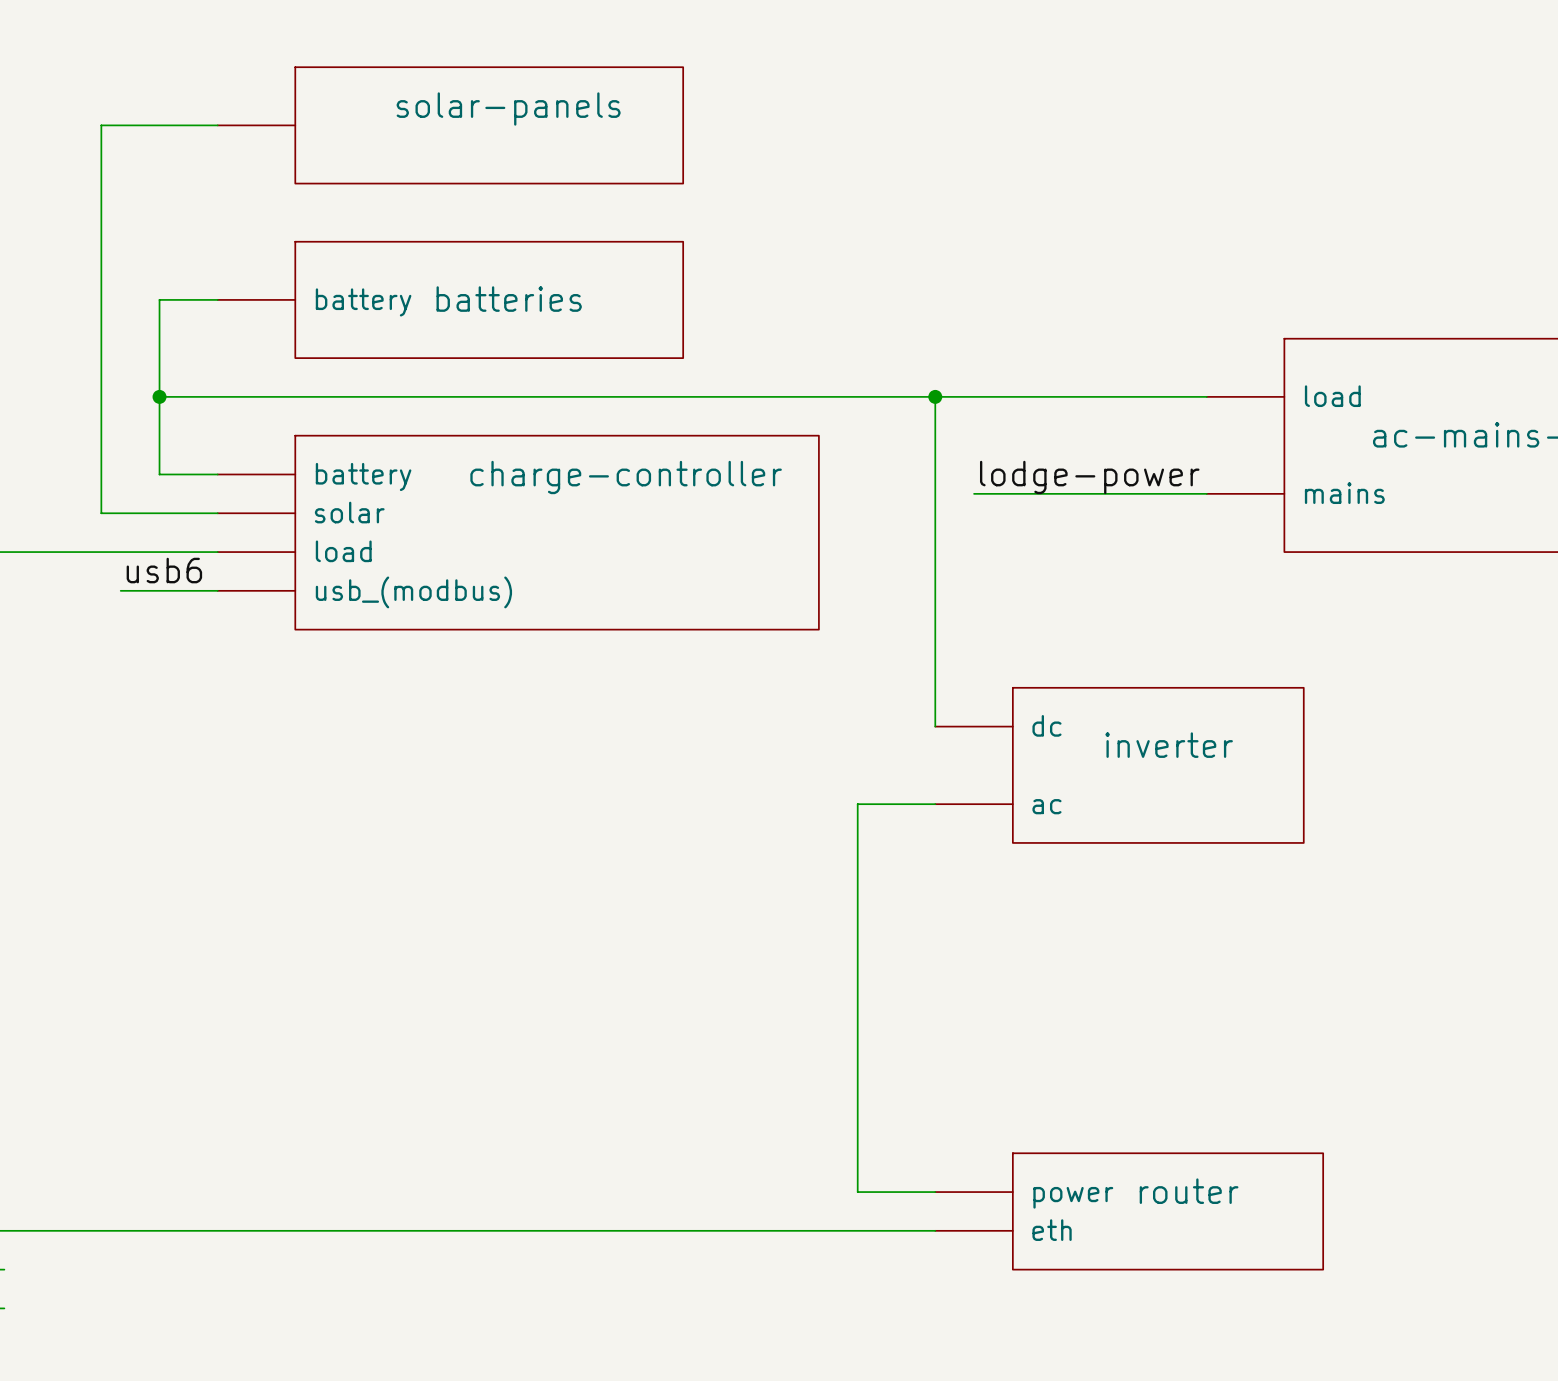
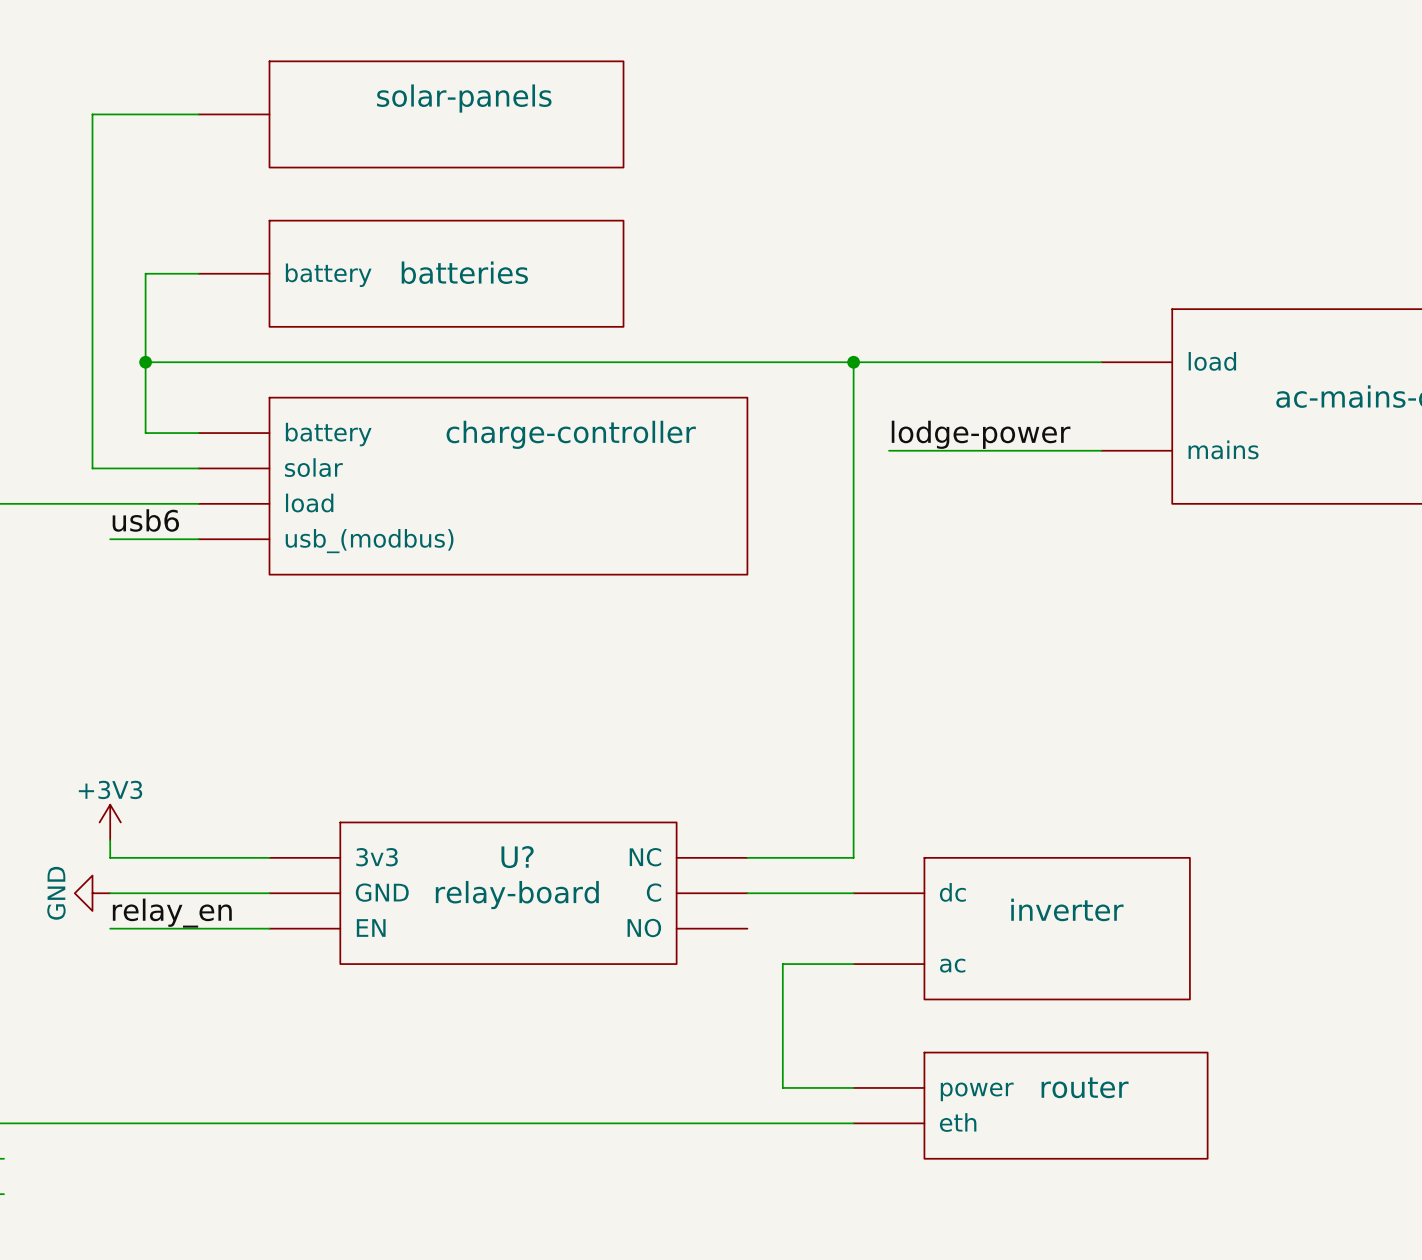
wire: none -> (853, 663) (853, 857) (747, 857)
part position: (1119, 765) -> (1021, 928)
wire: (935, 804) (857, 804) (857, 1056) -> (853, 964) (782, 964)
power symbol: none -> +3V3 (110, 822)
wire: none -> (110, 840) (110, 857) (269, 857)
power symbol: none -> GND (92, 893)
wire: none -> (110, 893) (269, 893)
U?: none -> relay-board (508, 893)
wire: none -> (747, 893) (853, 893)
label: none -> relay_en (172, 913)
wire: none -> (110, 928) (269, 928)

